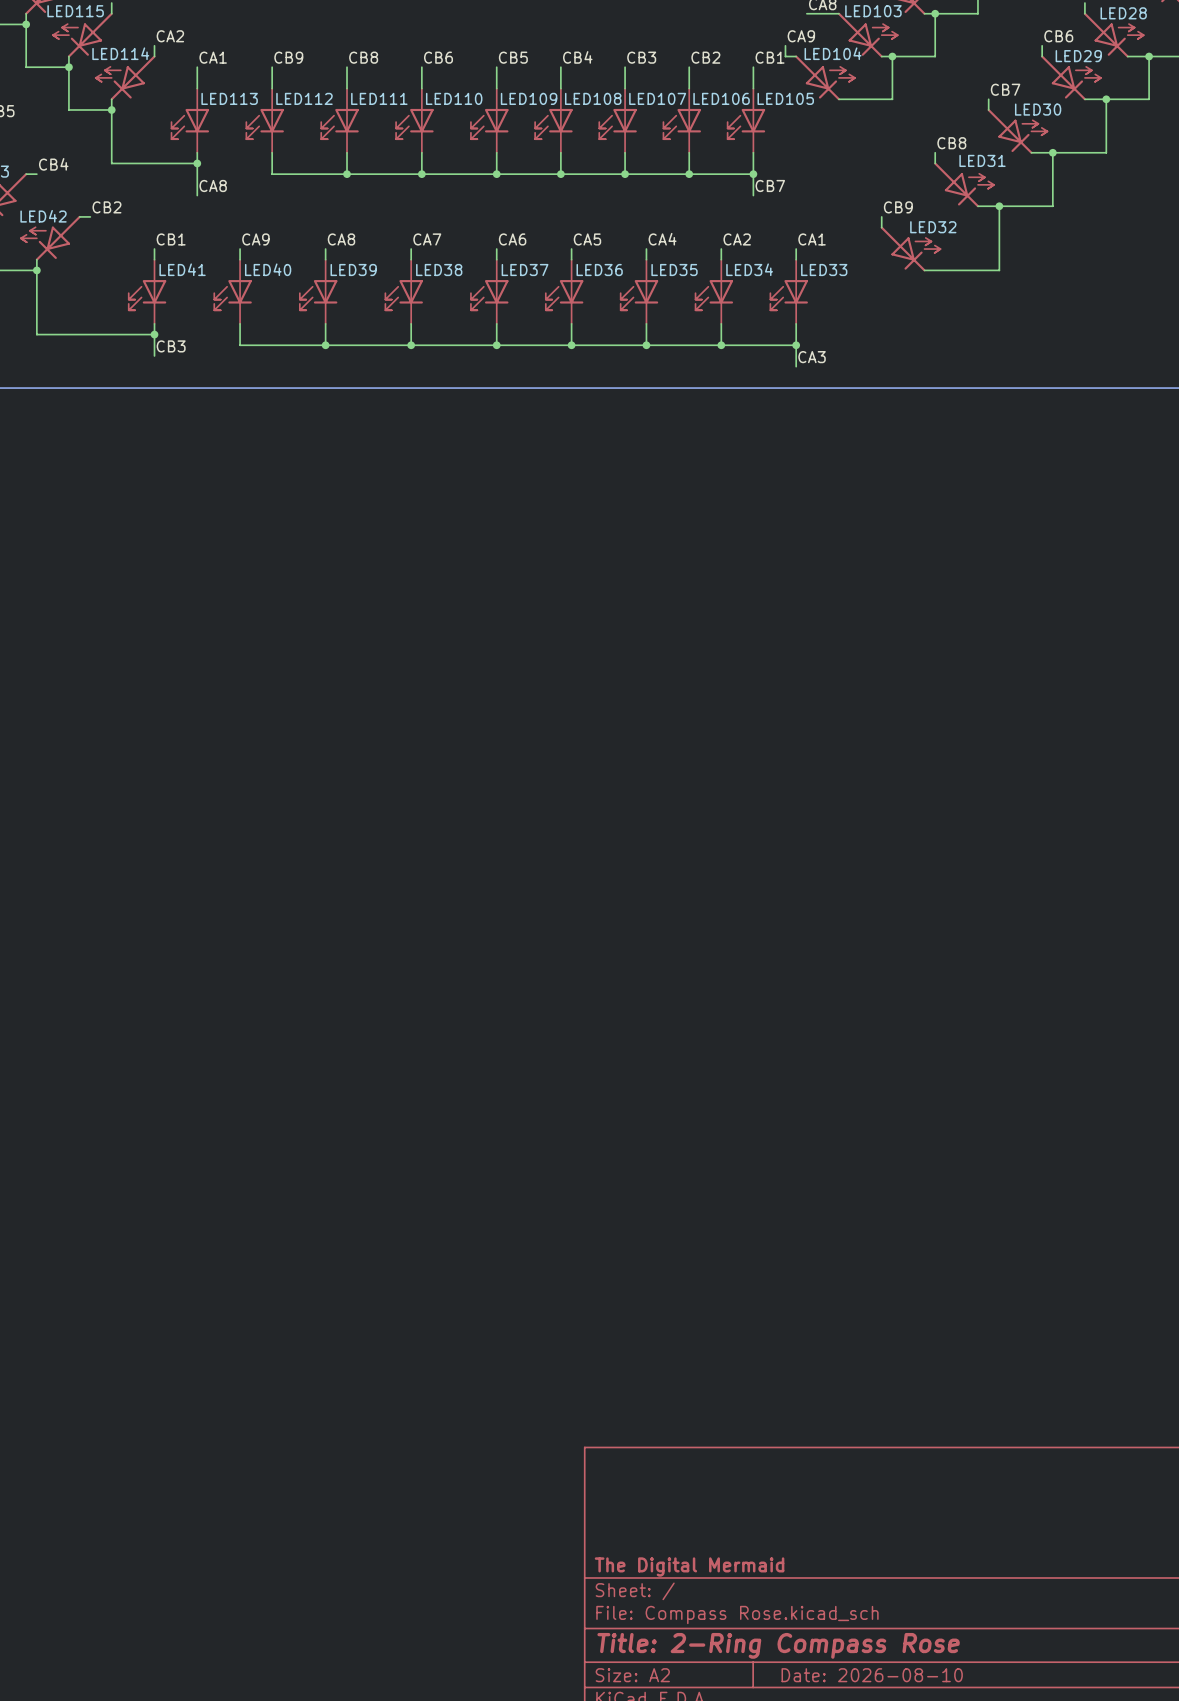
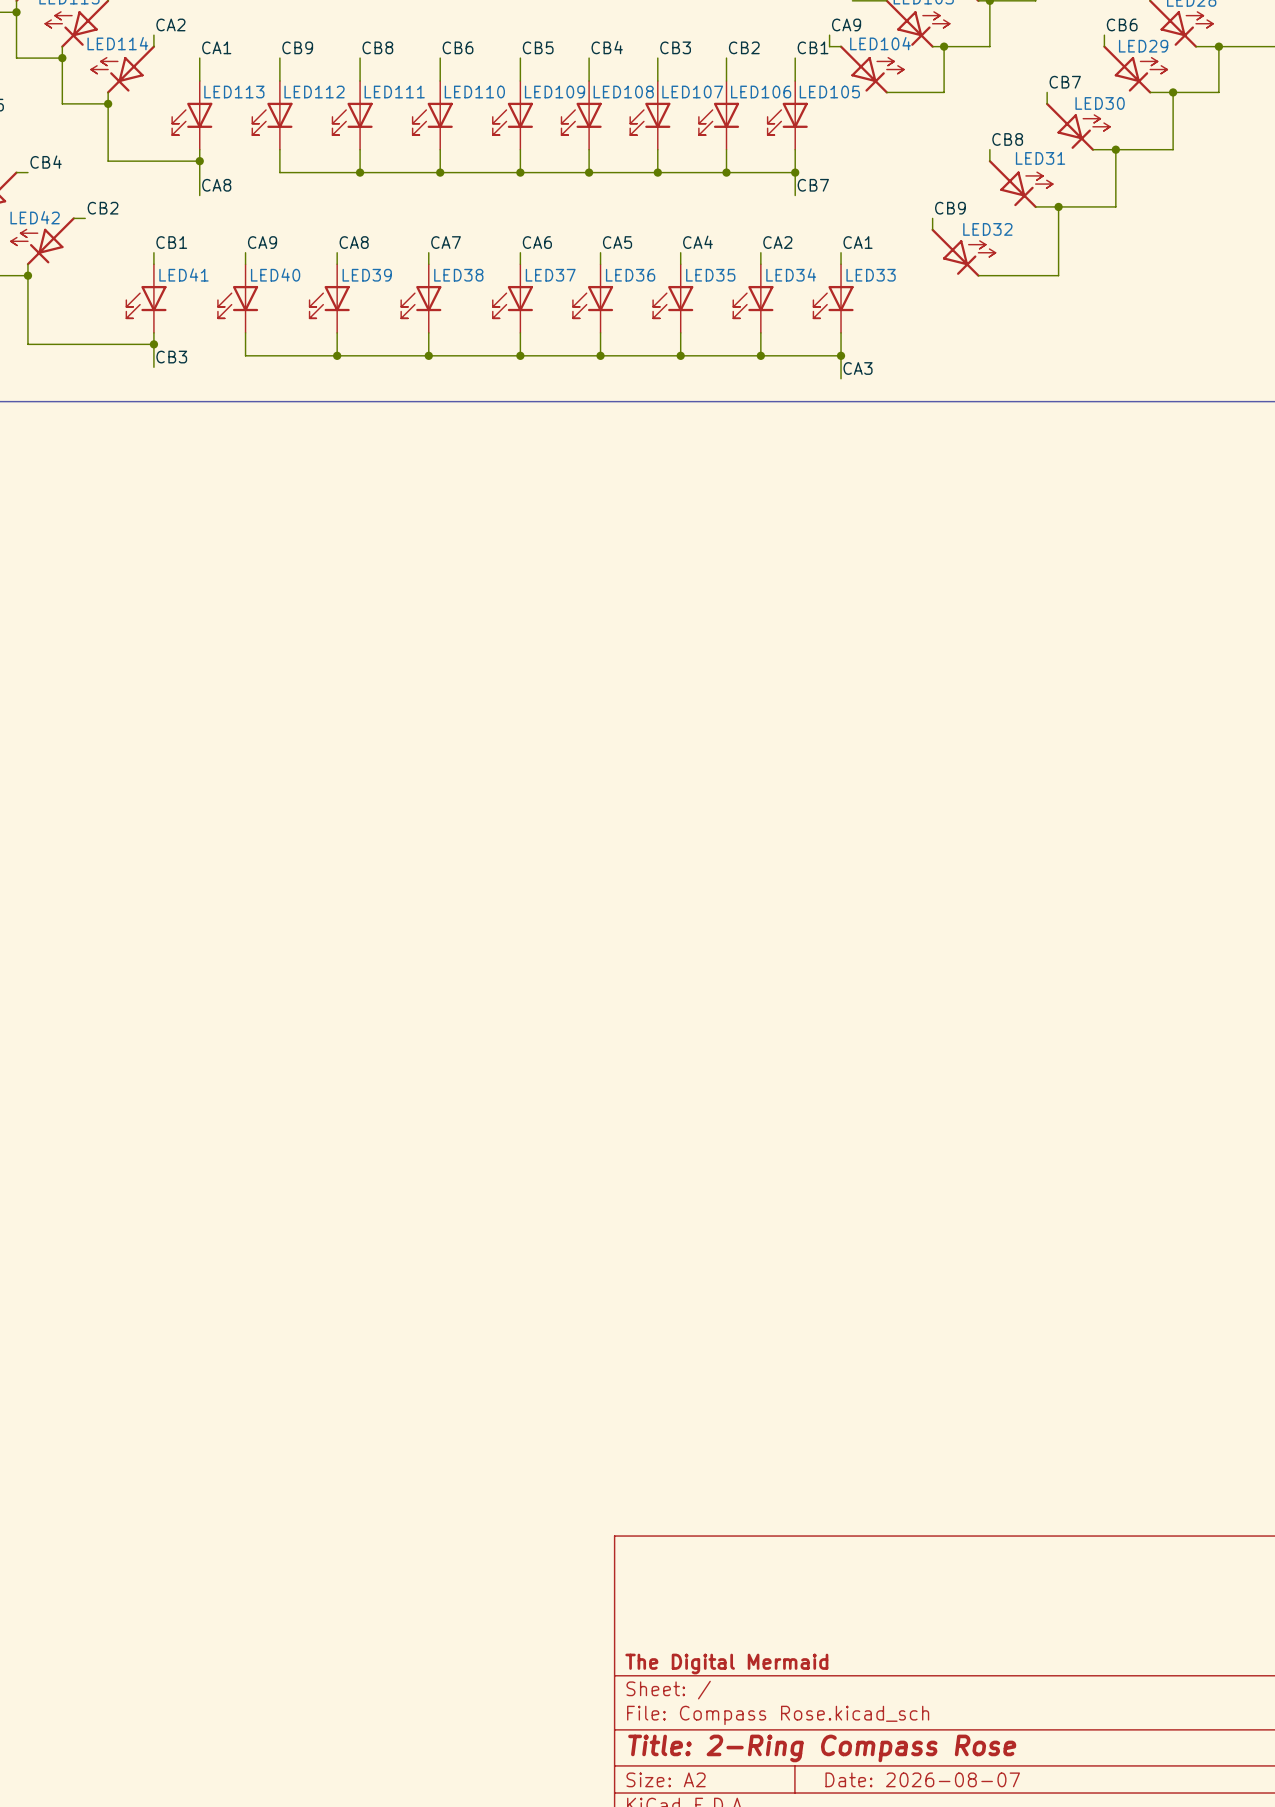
title block: Date: 2026-08-10 (872, 1675) -> Date: 2026-08-07 (922, 1779)

